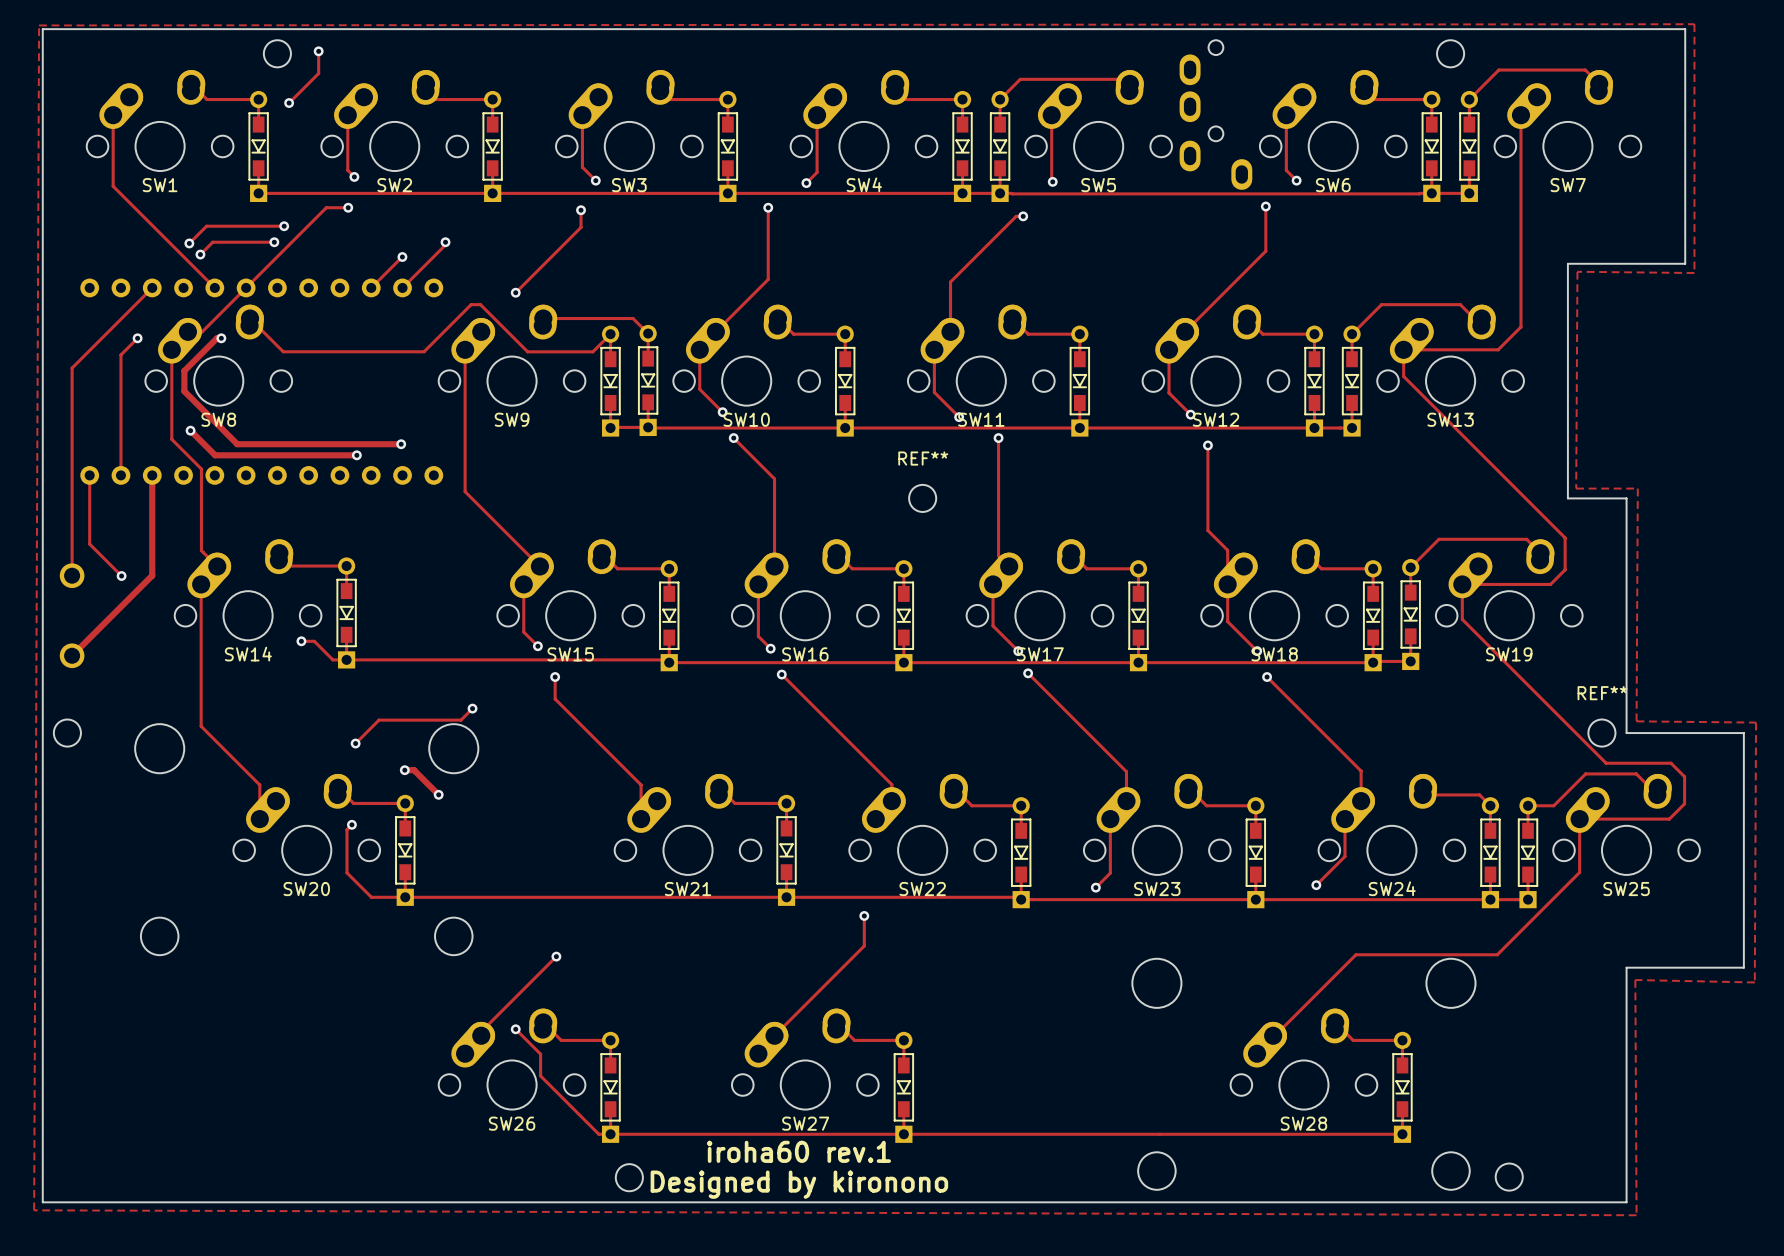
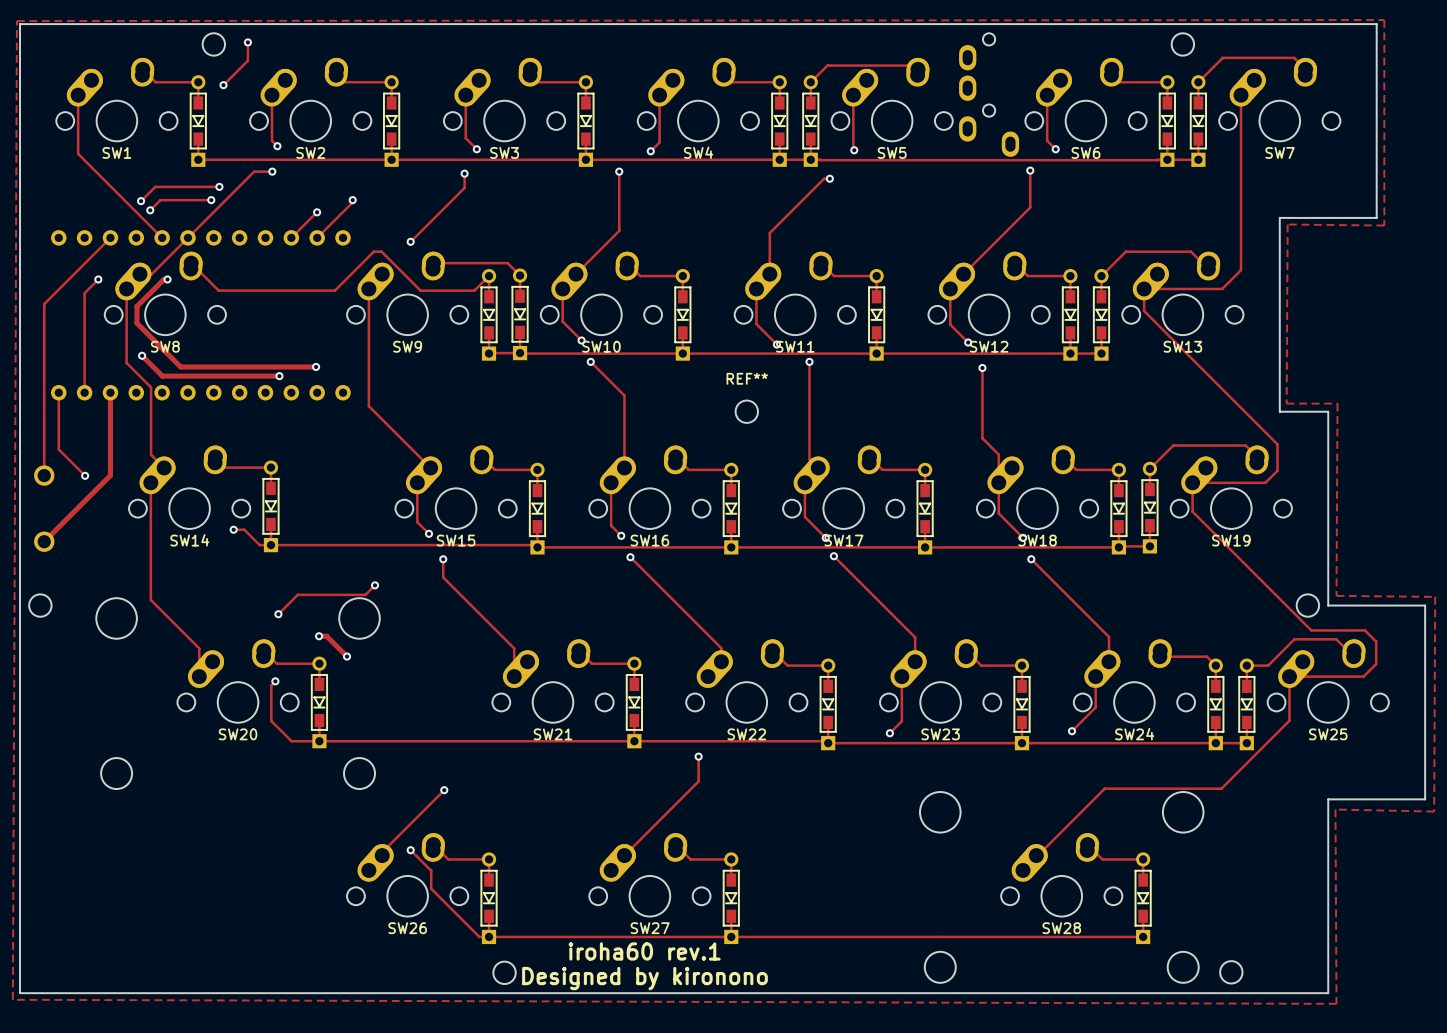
REF** name: REF** (1602, 693) -> none

